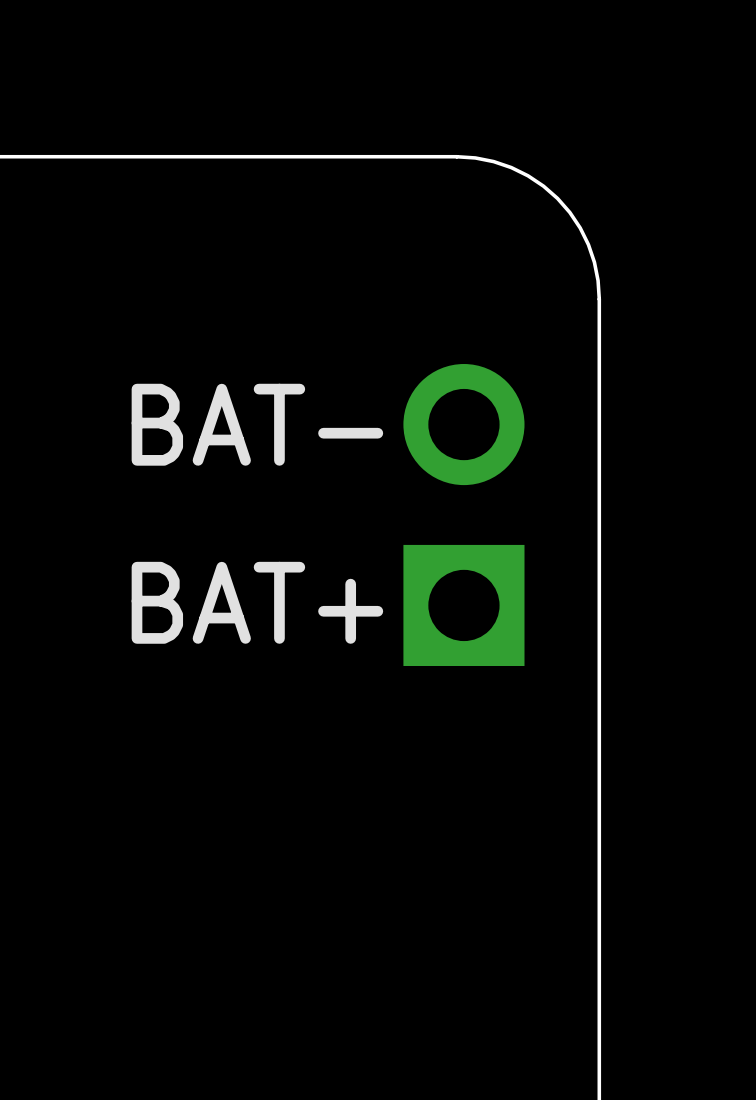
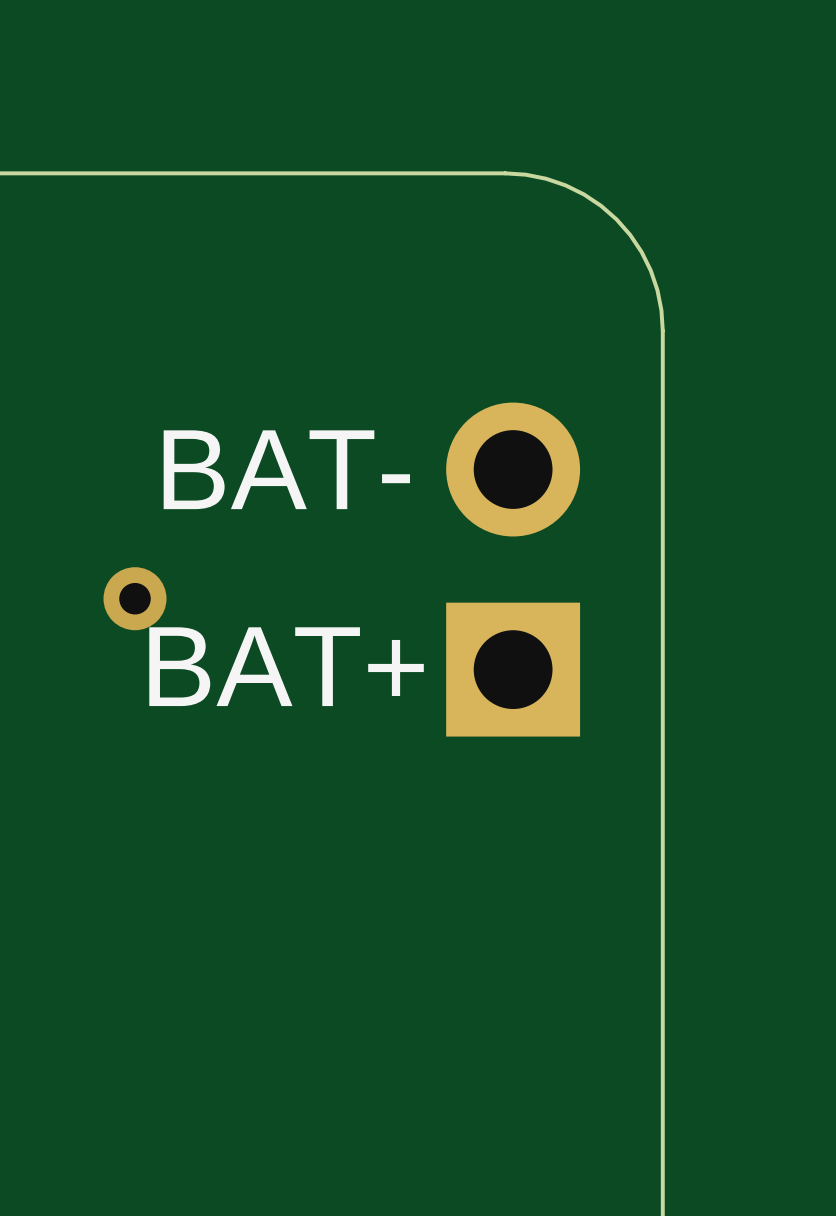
via: none -> (135, 598)

